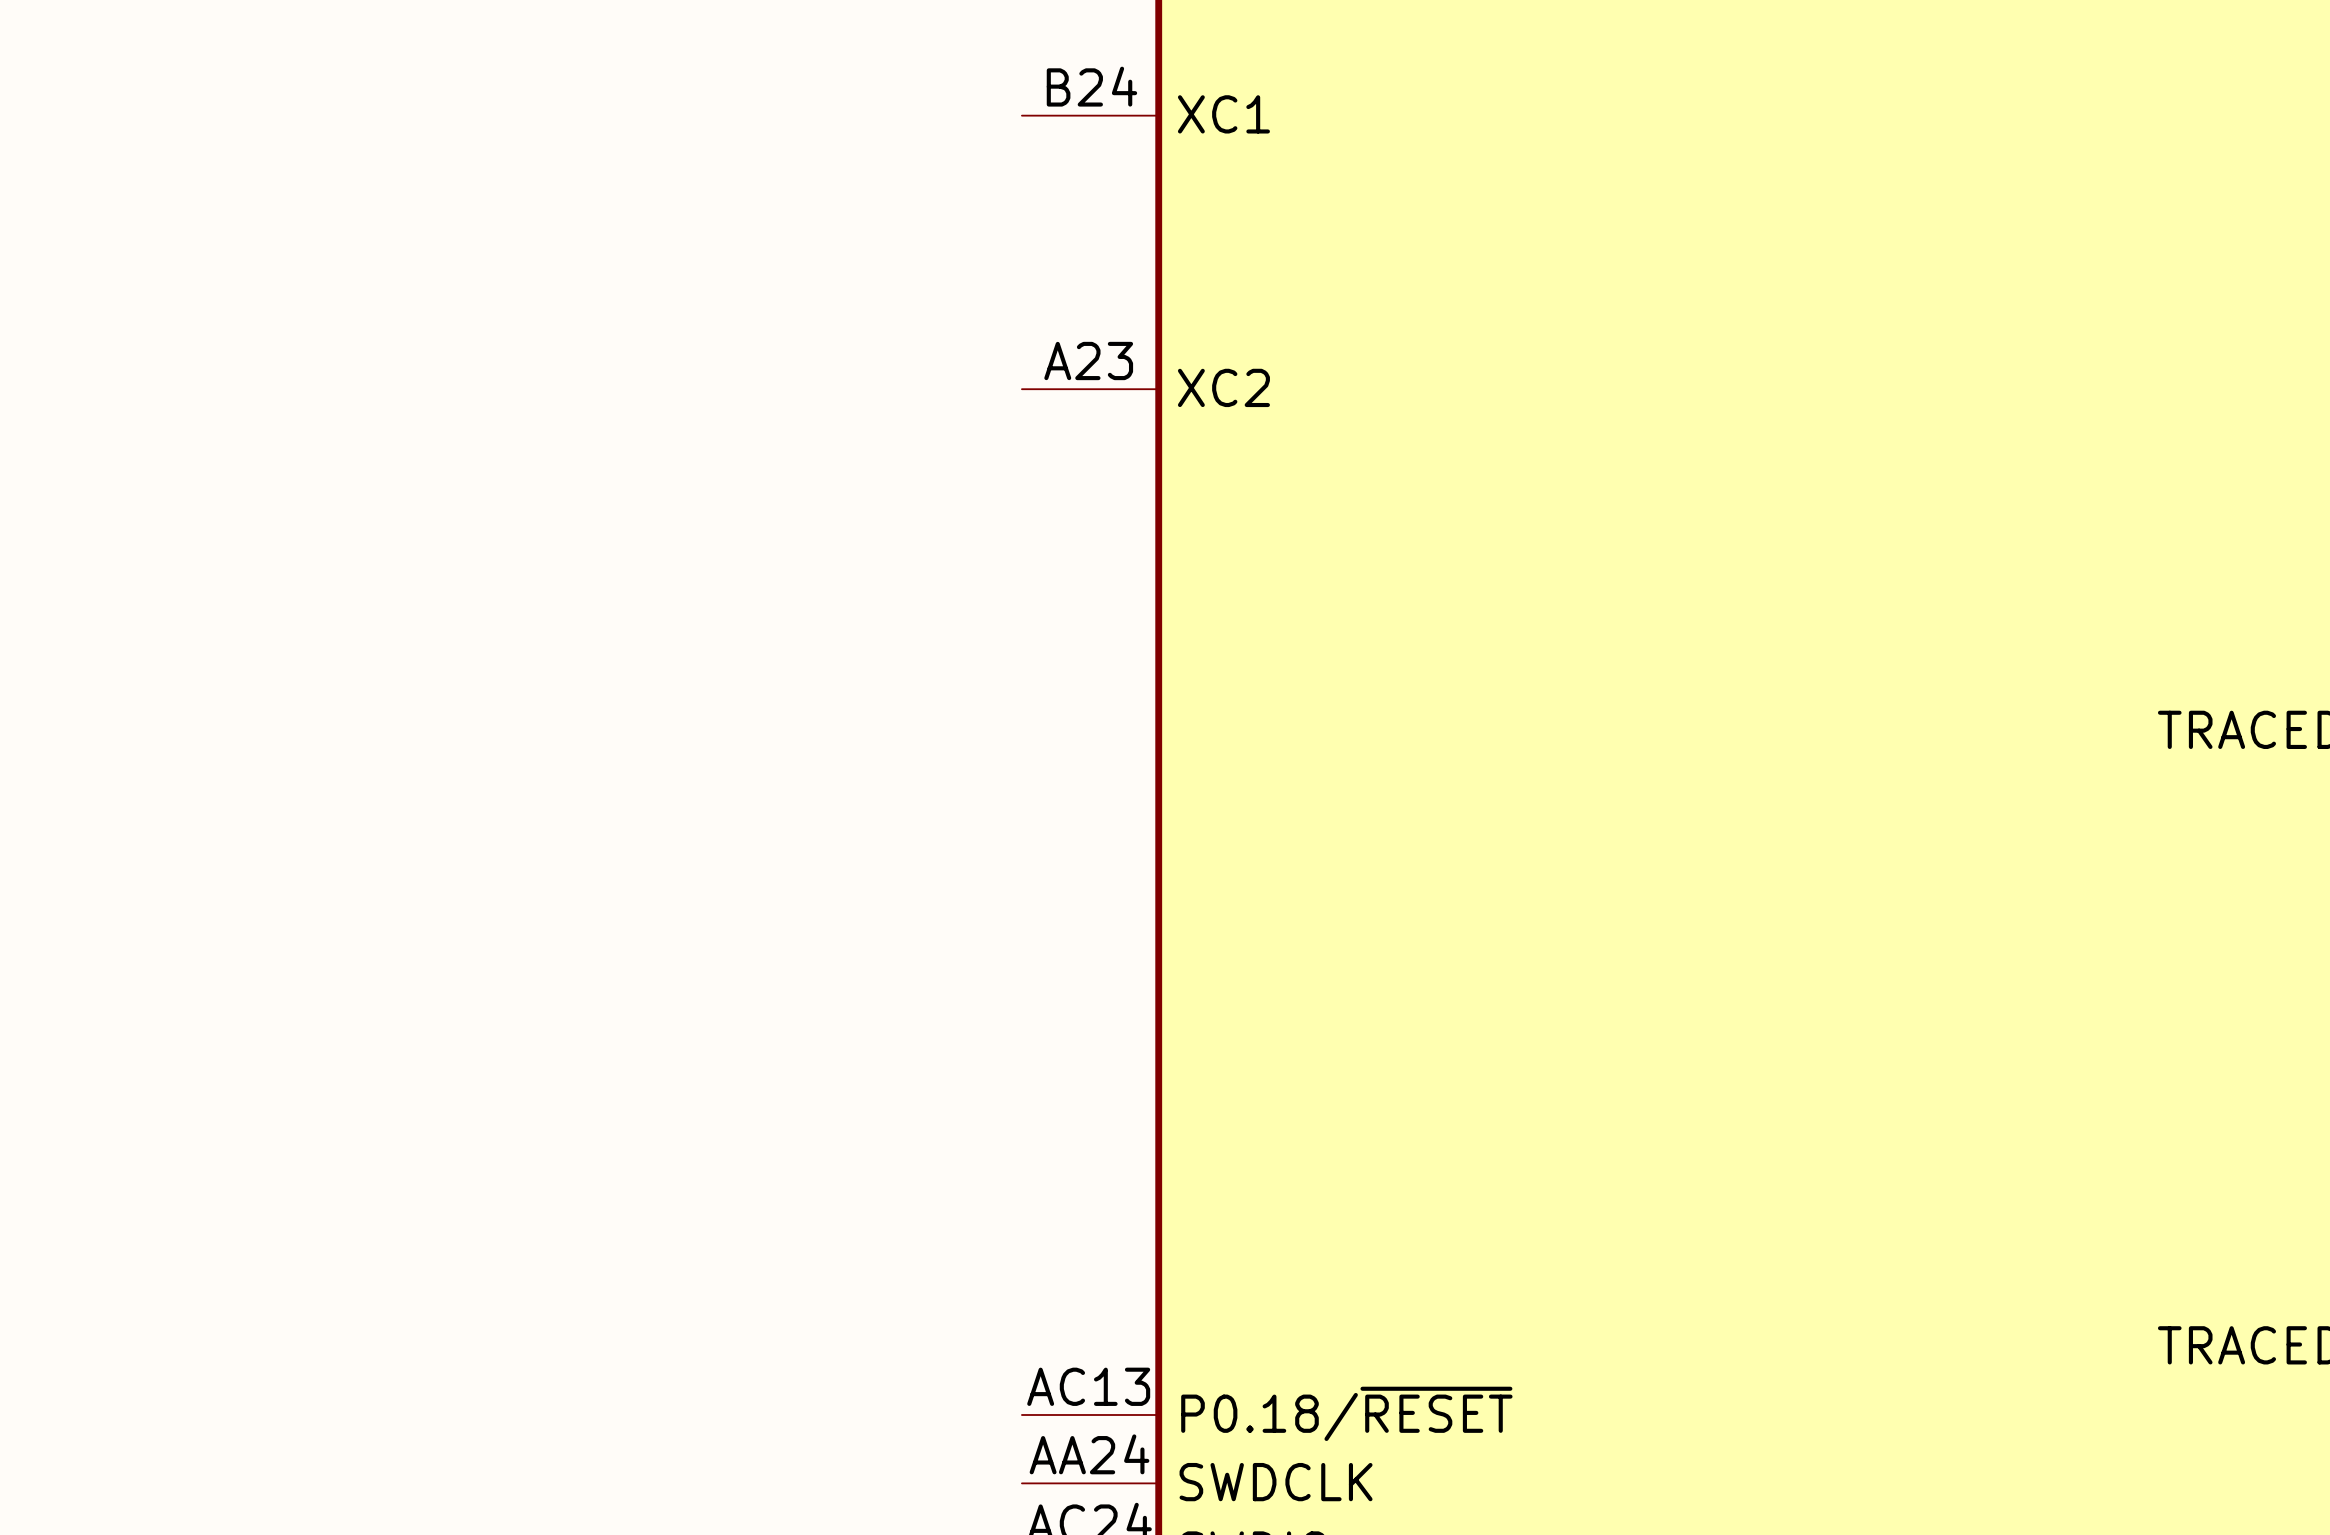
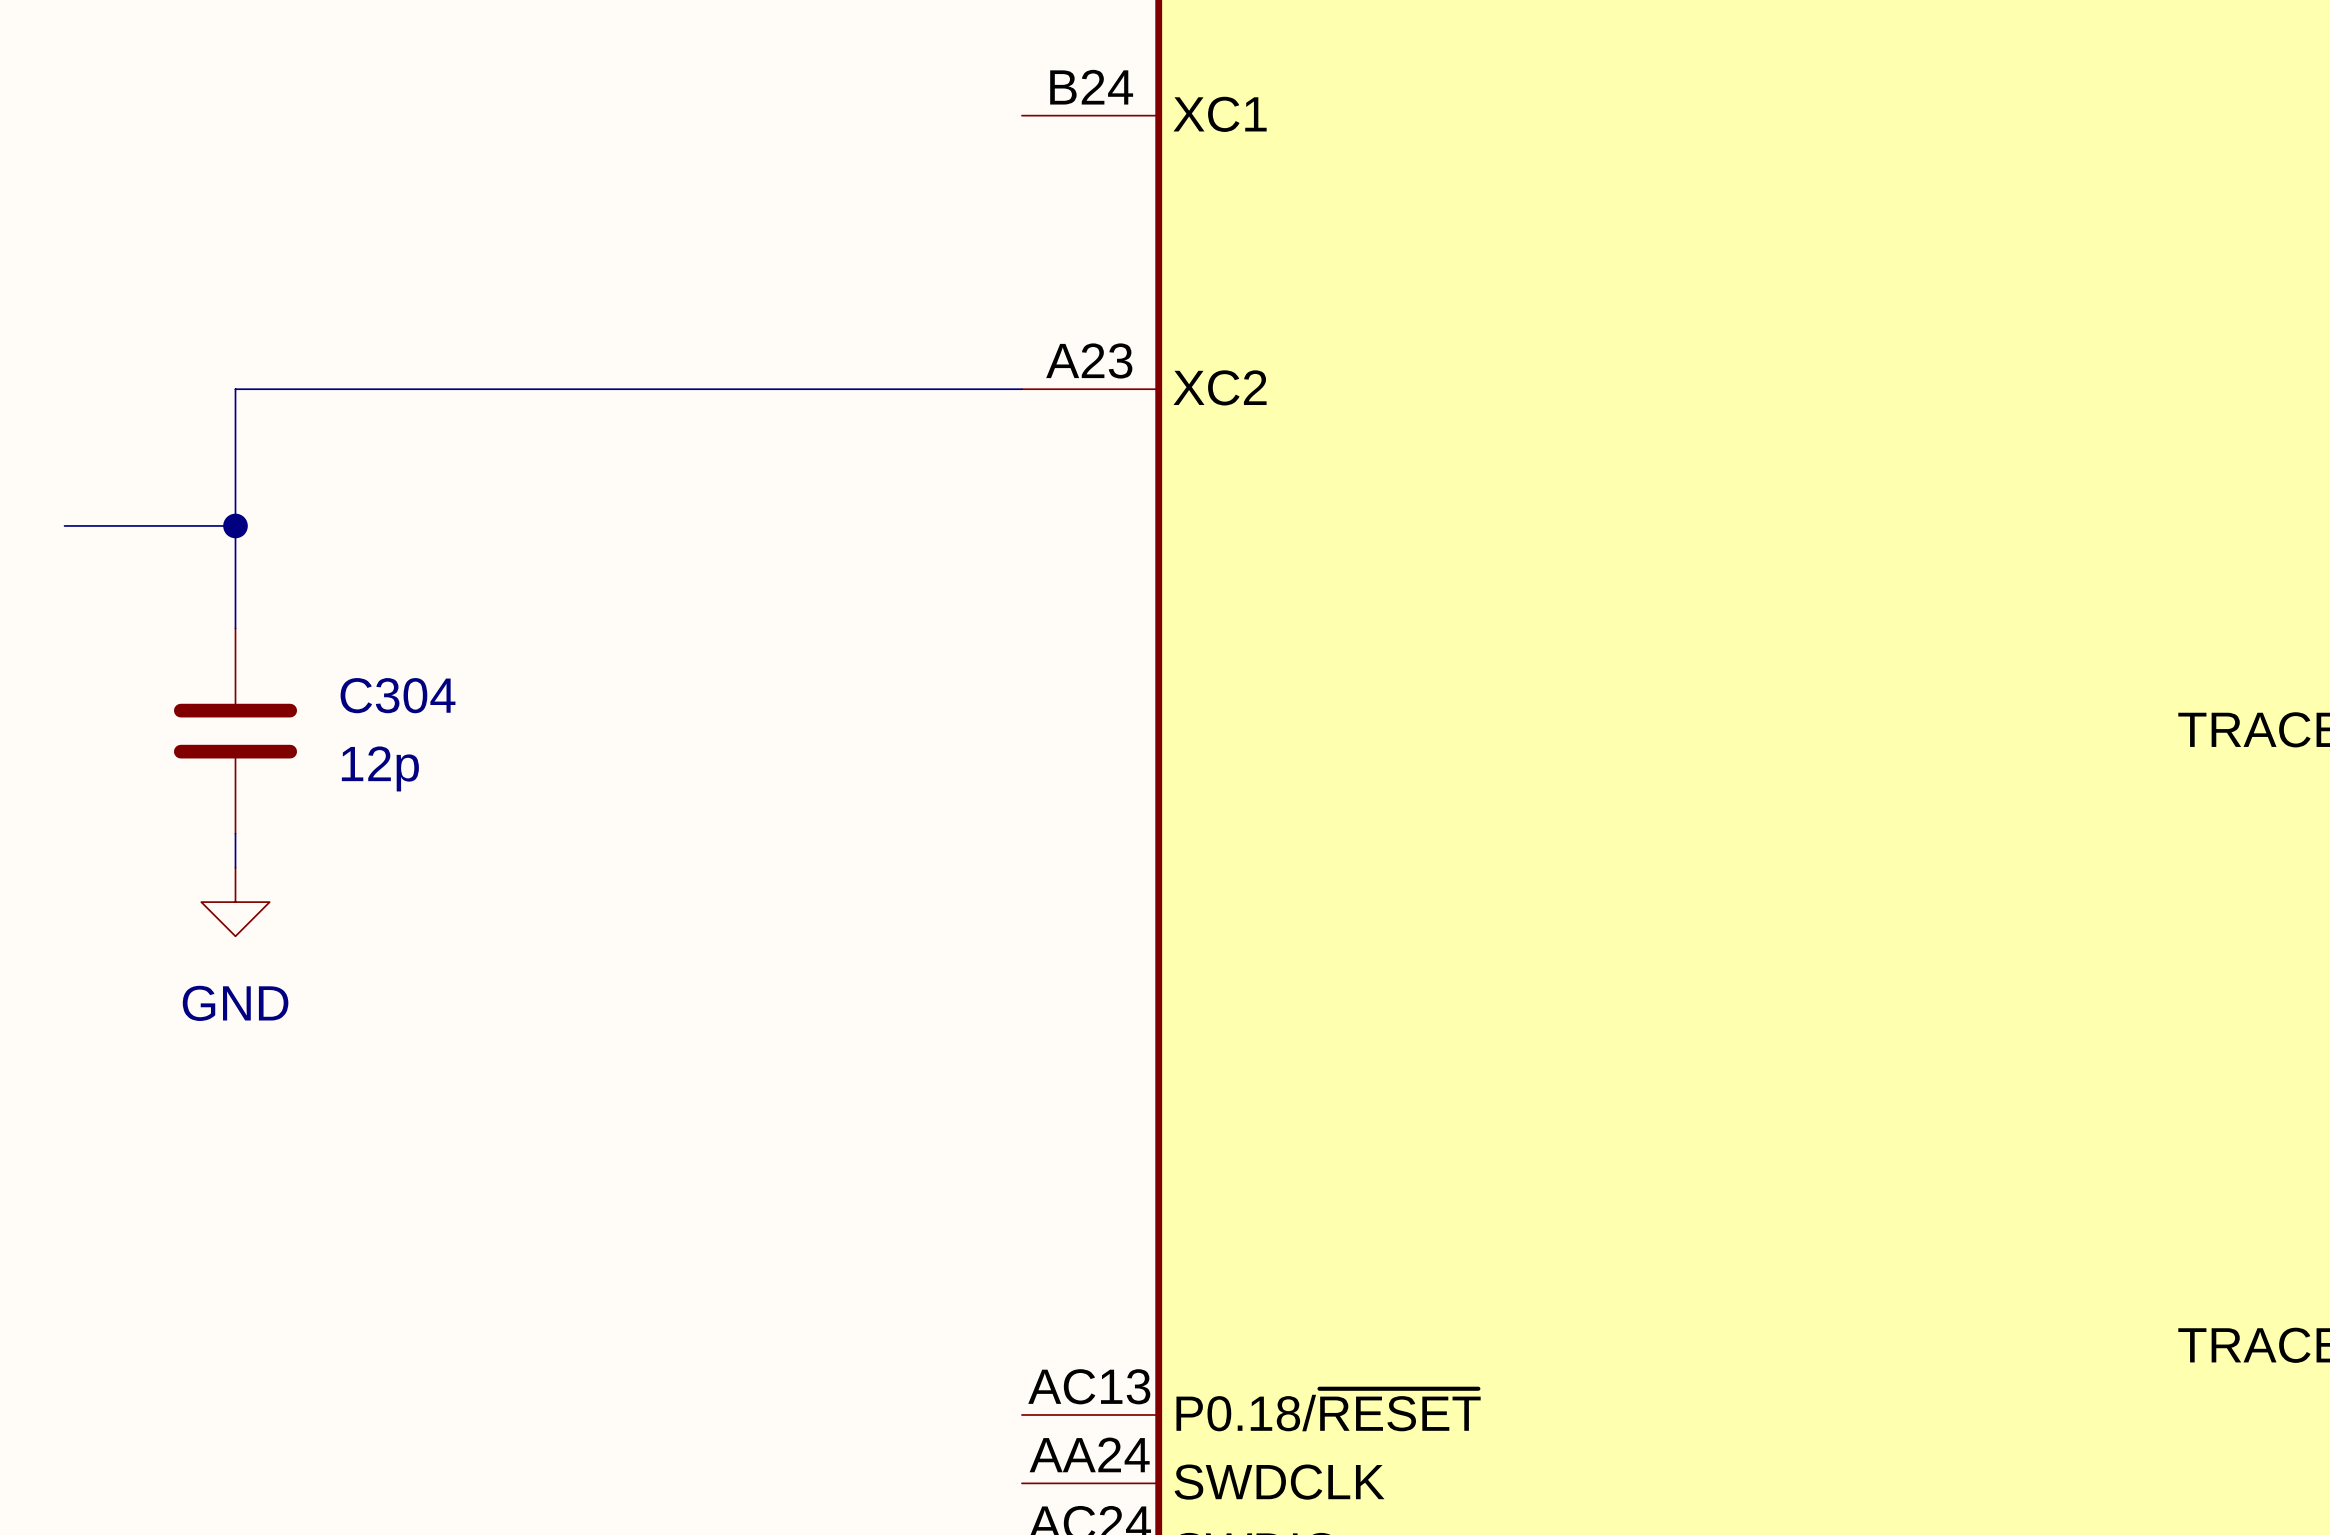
wire: none -> (1021, 389) (235, 389) (235, 628)
wire: none -> (64, 525) (235, 525)
junction: none -> (235, 525)
C304: none -> 12p (235, 731)
wire: none -> (235, 833) (235, 867)
power symbol: none -> GND (235, 902)

